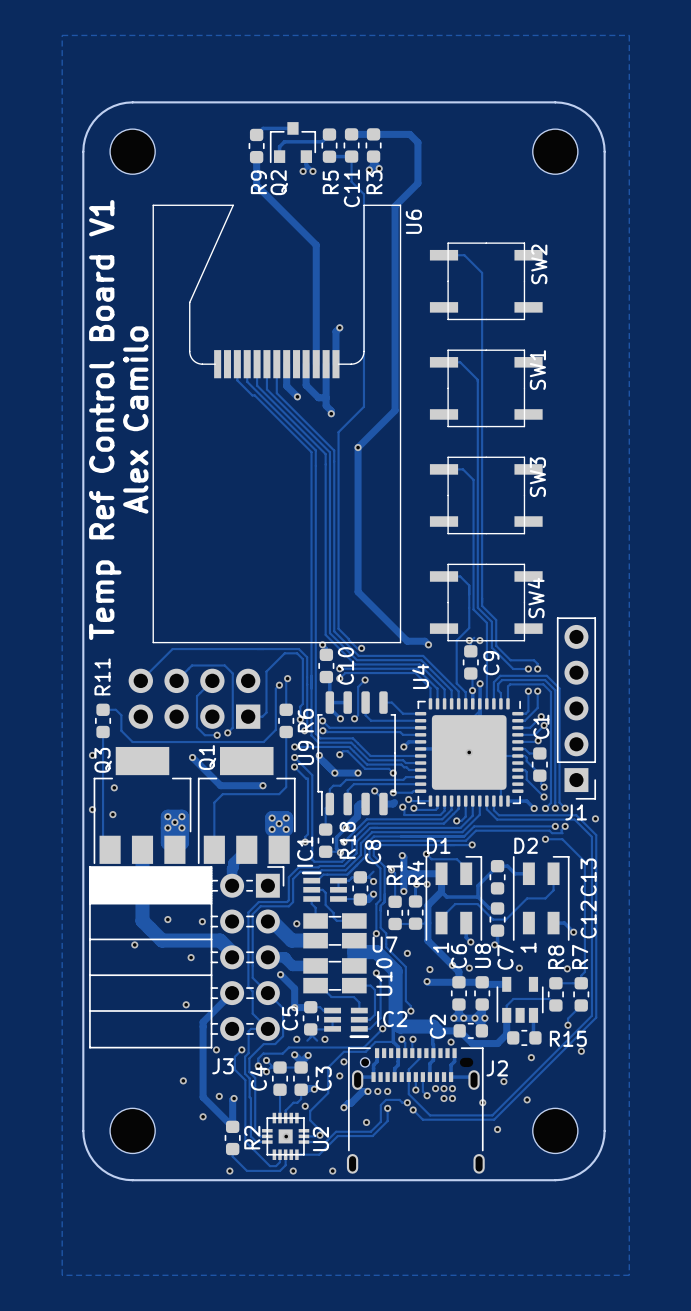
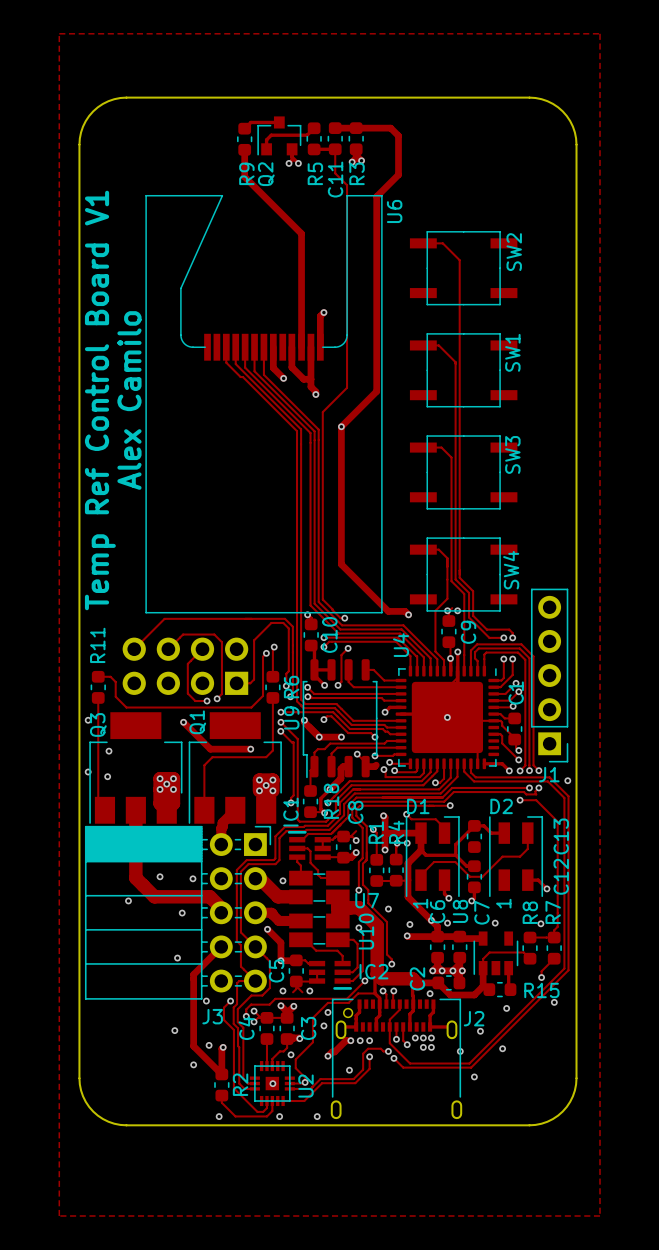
part: (132, 151) -> none
part: (555, 151) -> none
part: (132, 1130) -> none
part: (555, 1130) -> none

